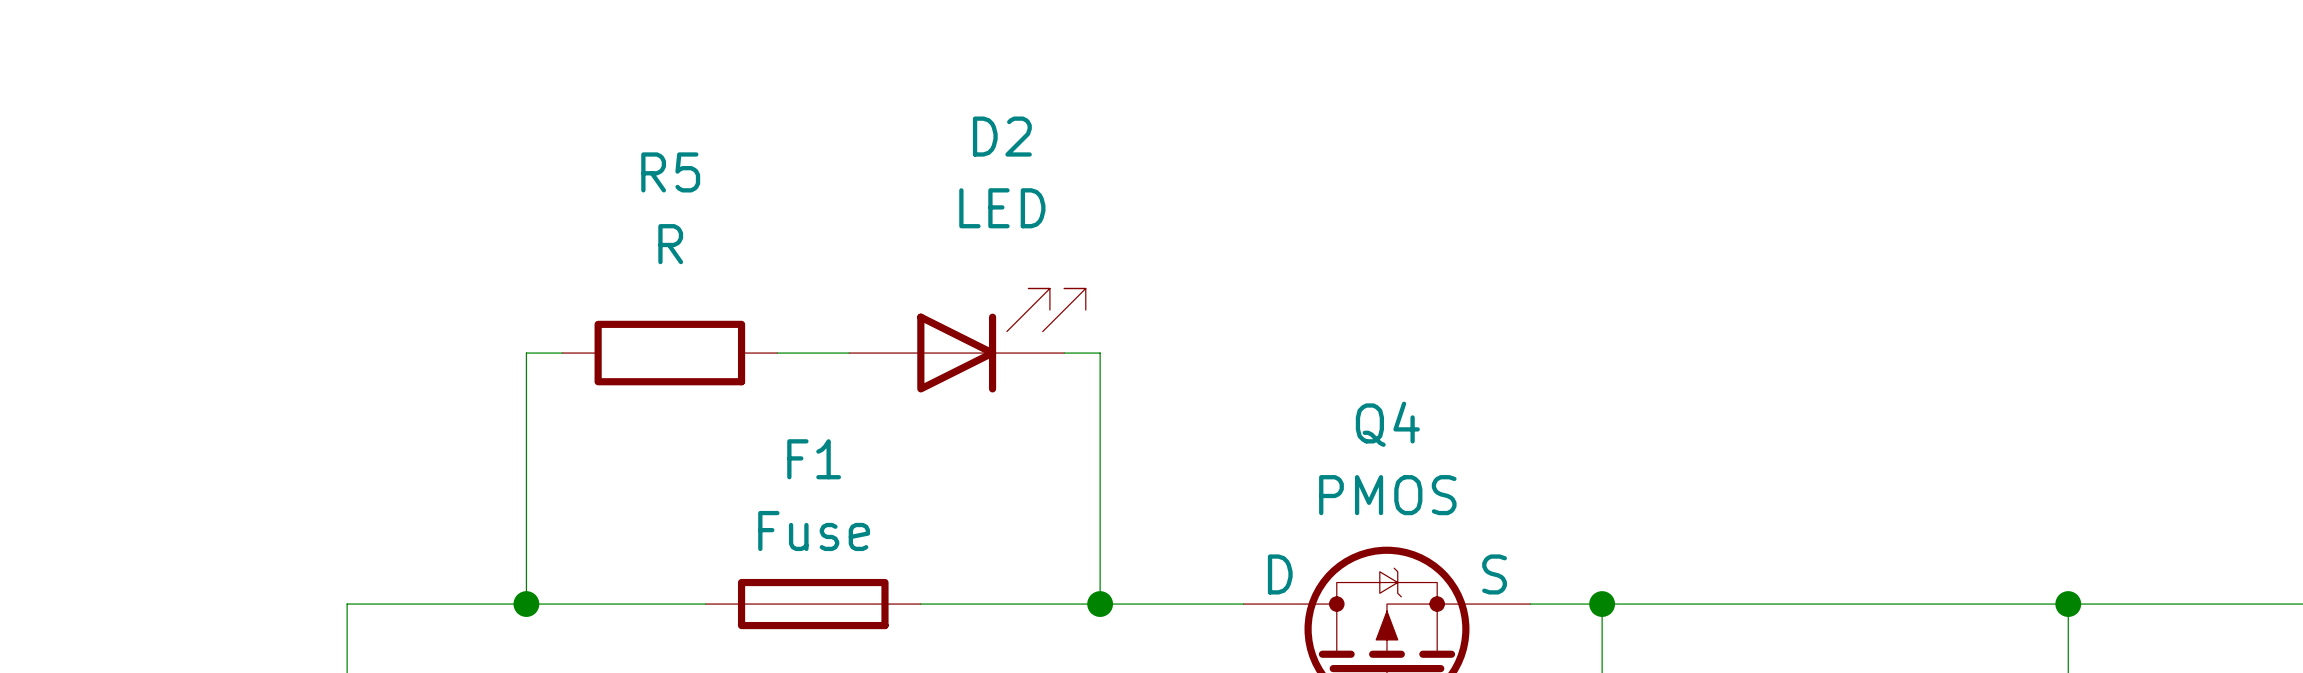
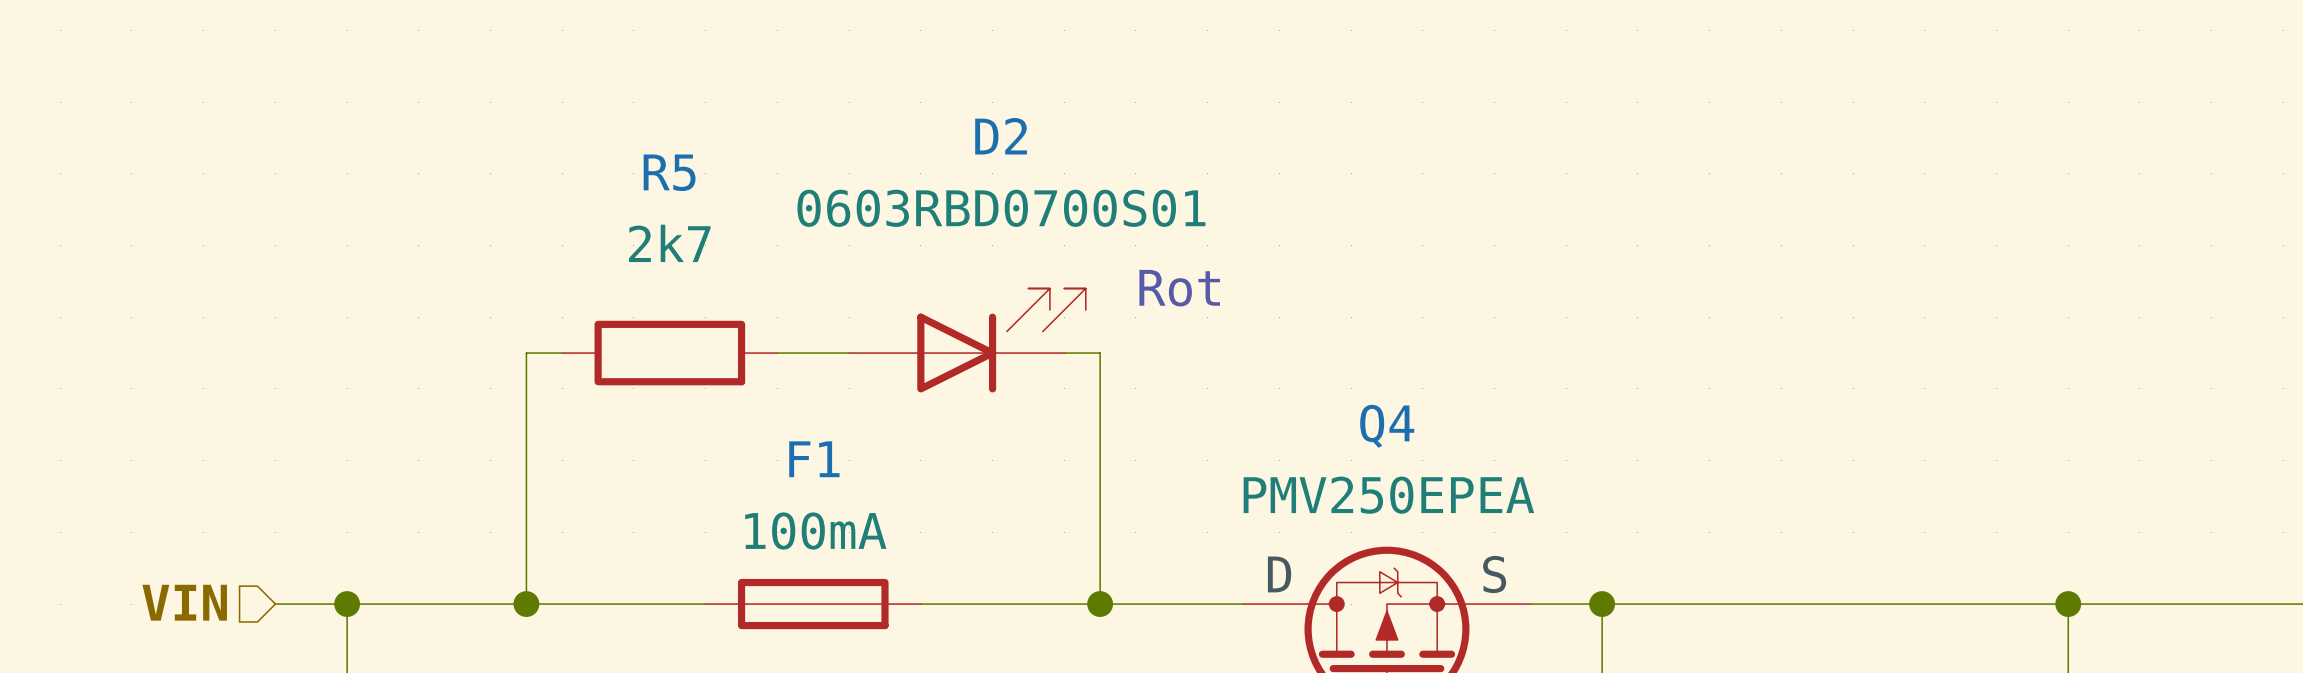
D2 value: LED (1002, 208) -> 0603RBD0700S01 (1001, 208)
R5 value: R (670, 244) -> 2k7 (669, 243)
text: none -> Rot (1179, 288)
Q4 value: PMOS (1387, 495) -> PMV250EPEA (1388, 495)
F1 value: Fuse (814, 530) -> 100mA (815, 531)
hierarchical label: none -> VIN (184, 602)
wire: none -> (275, 604) (347, 604)
junction: none -> (347, 604)

